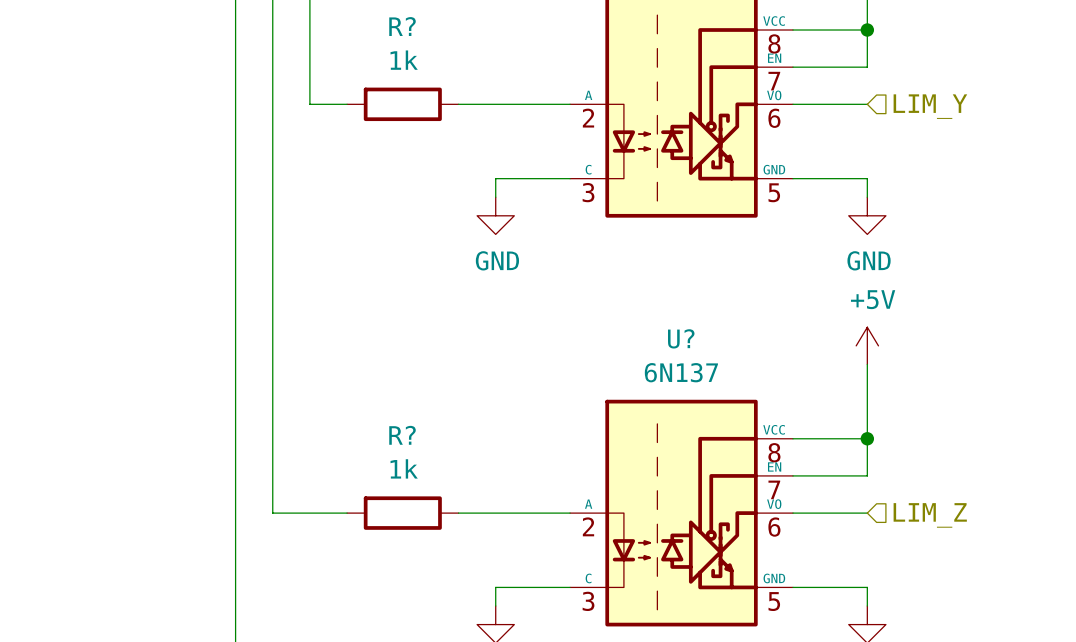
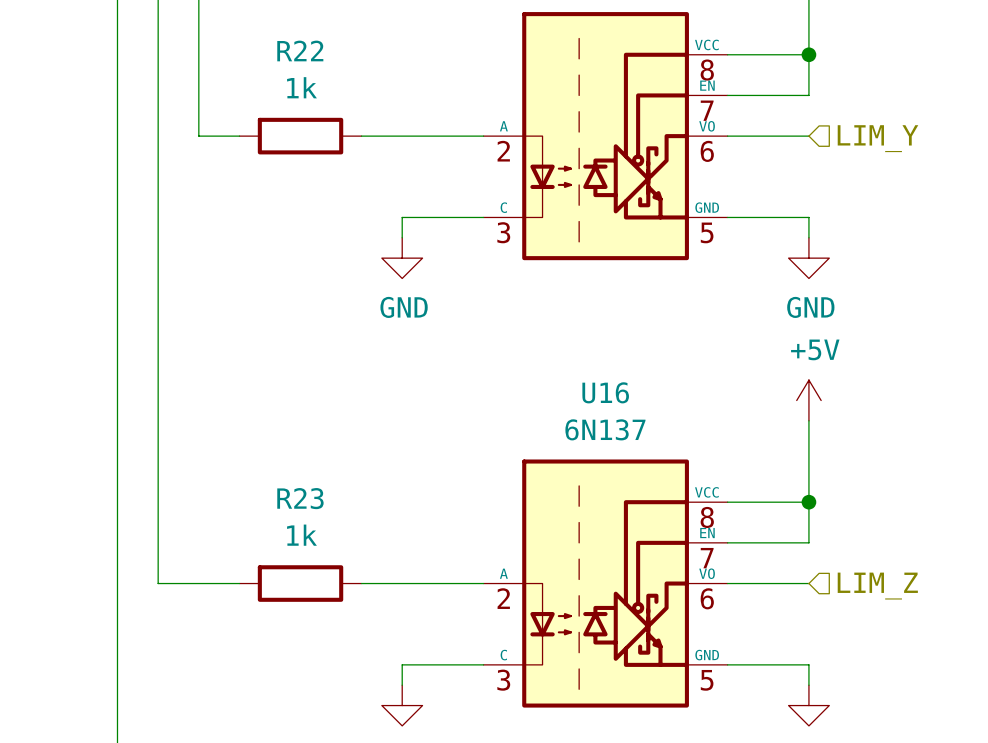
R? name: R? (402, 26) -> R22 (300, 50)
U? name: U? (681, 338) -> U16 (605, 392)
R? name: R? (402, 435) -> R23 (300, 498)

